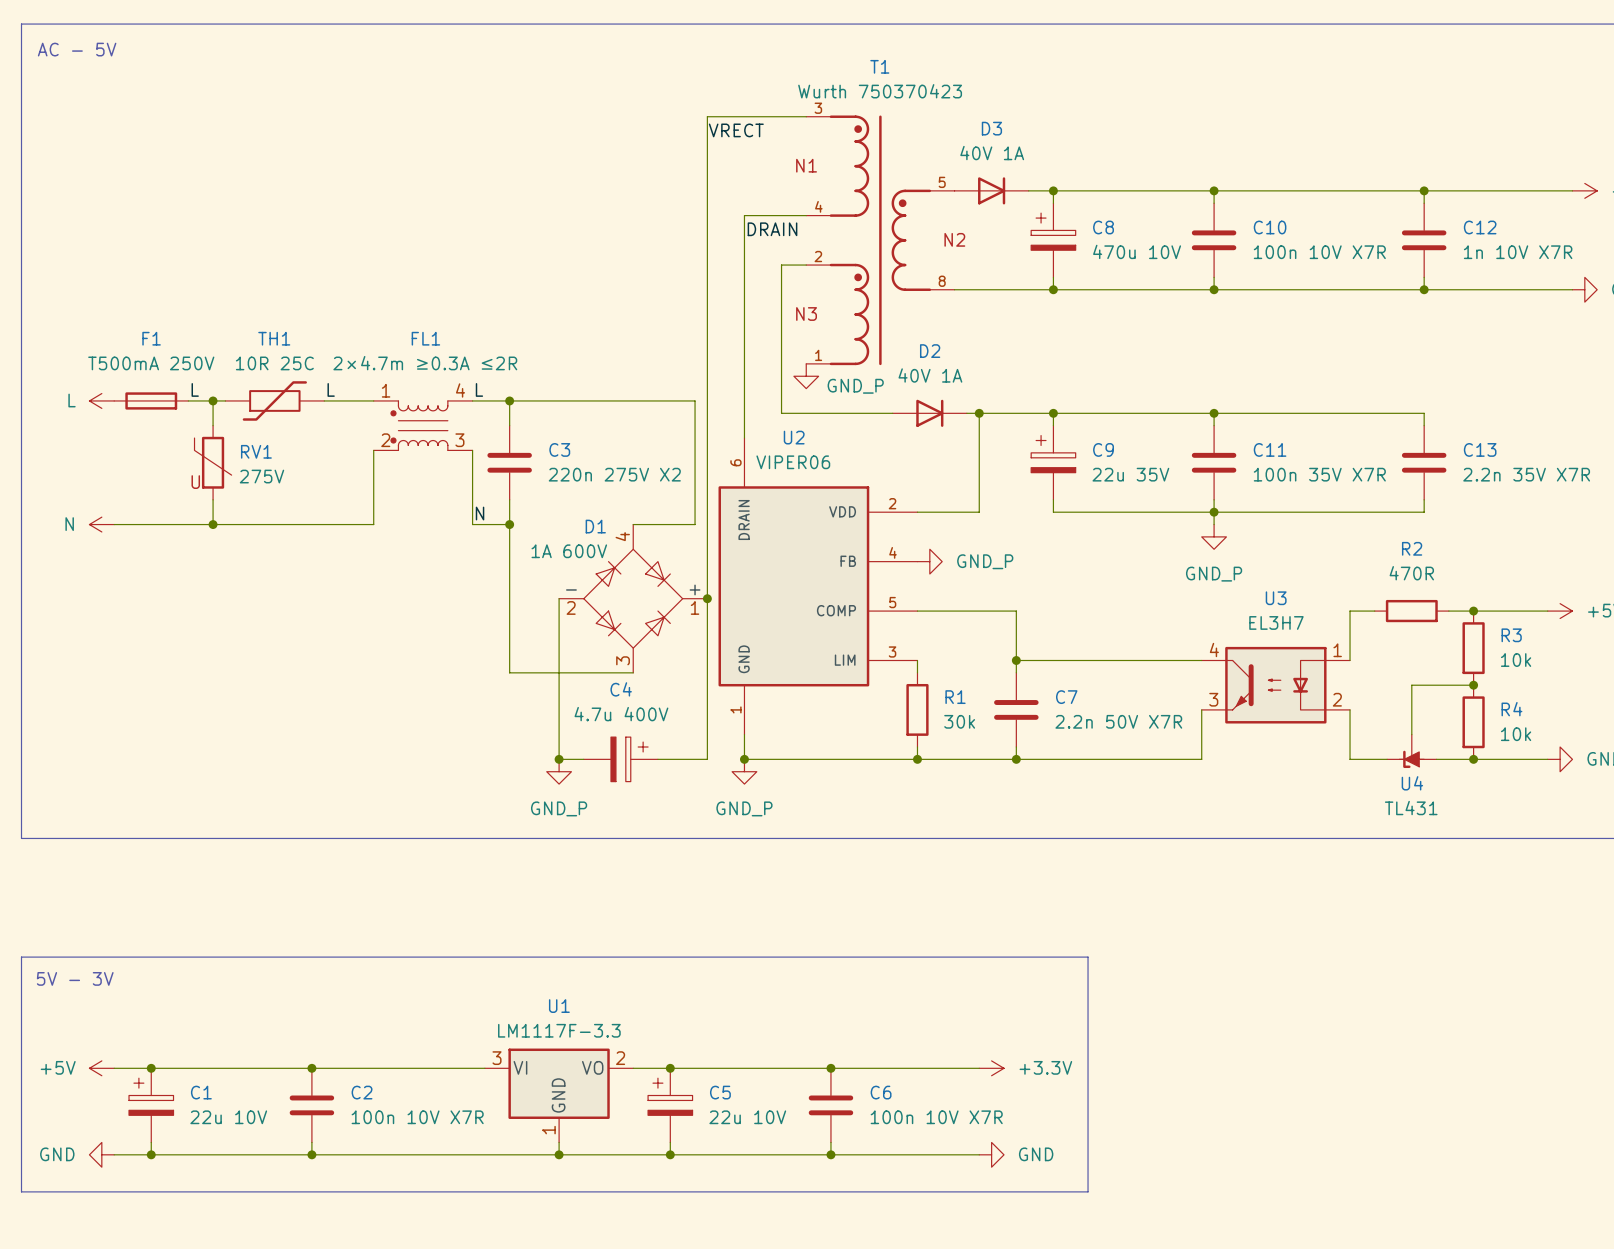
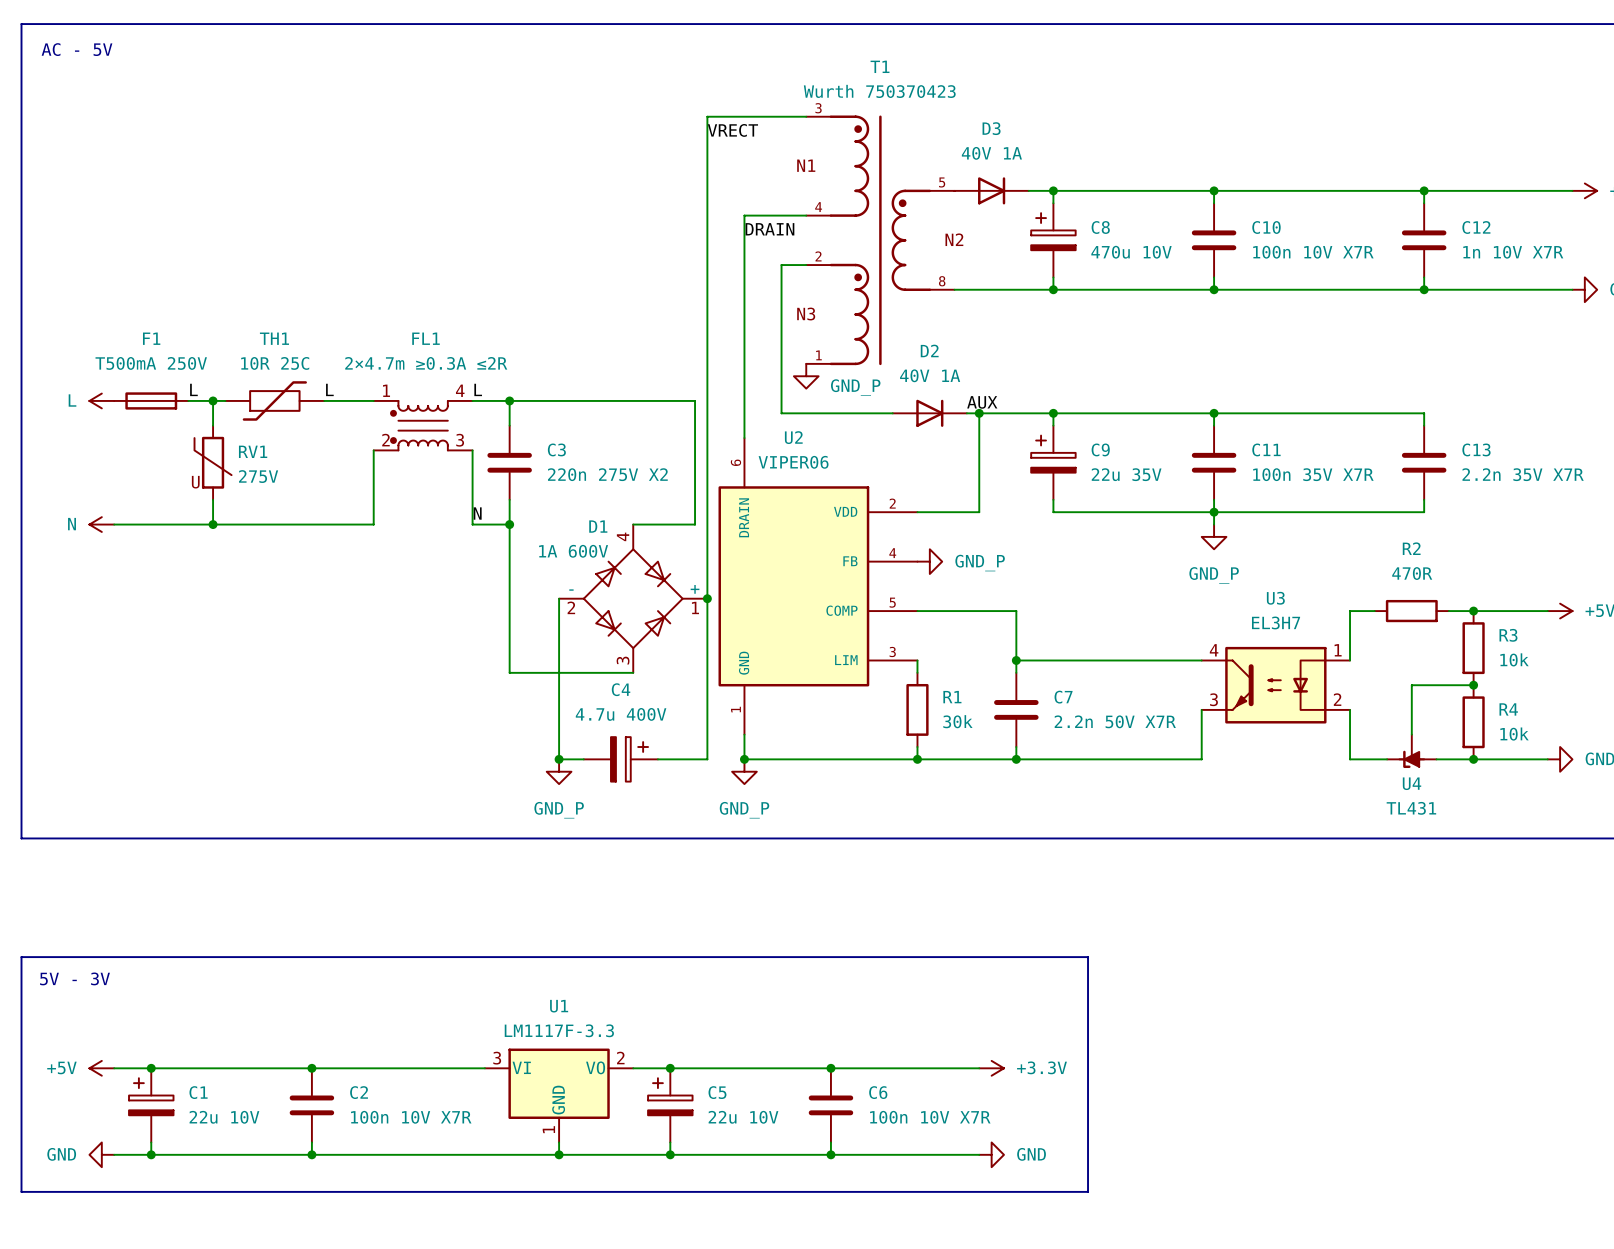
label: none -> AUX (982, 402)

